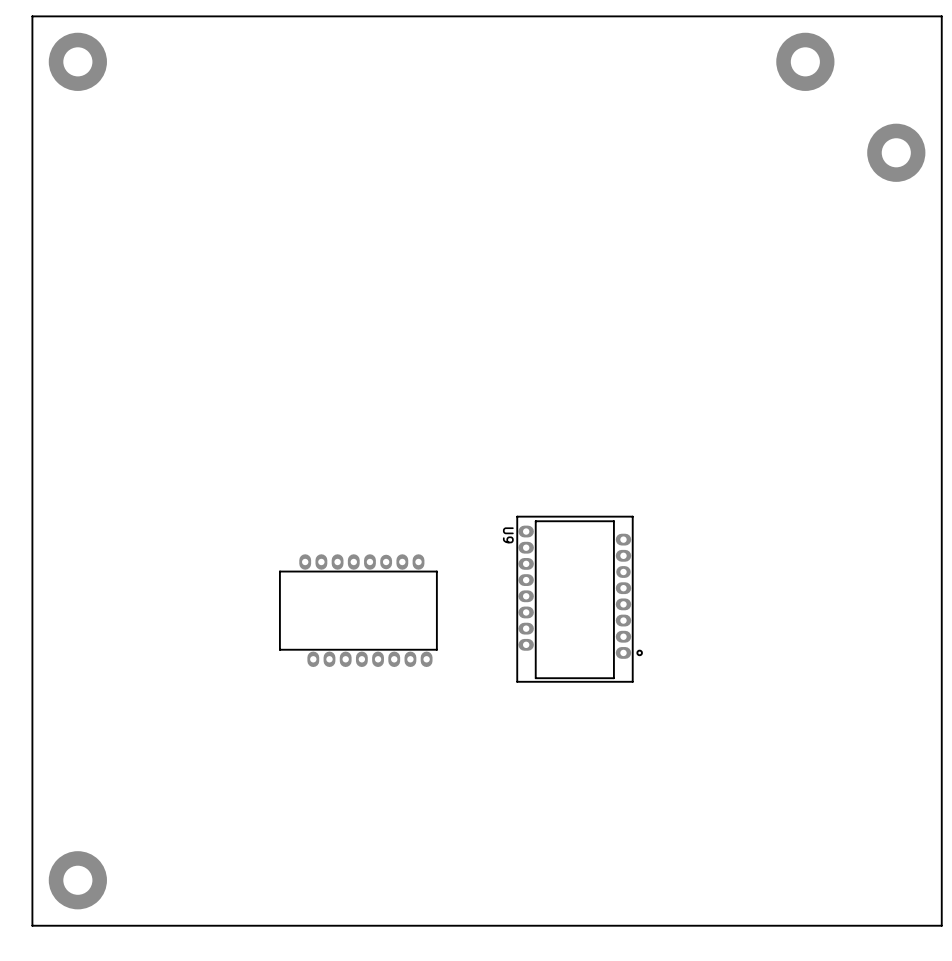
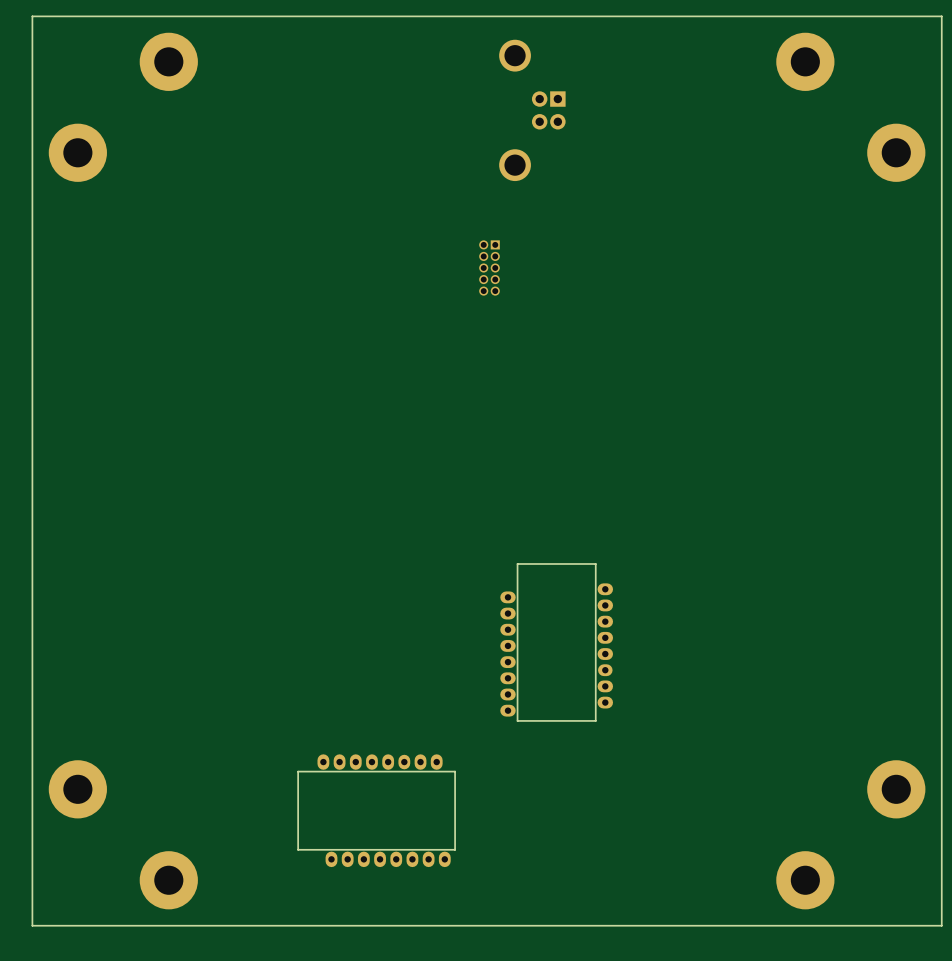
part: (77, 61) -> none
part: none -> (168, 61)
part: none -> (532, 110)
part: none -> (77, 152)
part: none -> (489, 267)
U9 side: bottom (579, 599) -> top (556, 642)
part position: (358, 610) -> (376, 810)
part: none -> (77, 789)
part: none -> (896, 789)
part: (77, 880) -> none
part: none -> (168, 880)
part: none -> (805, 880)

